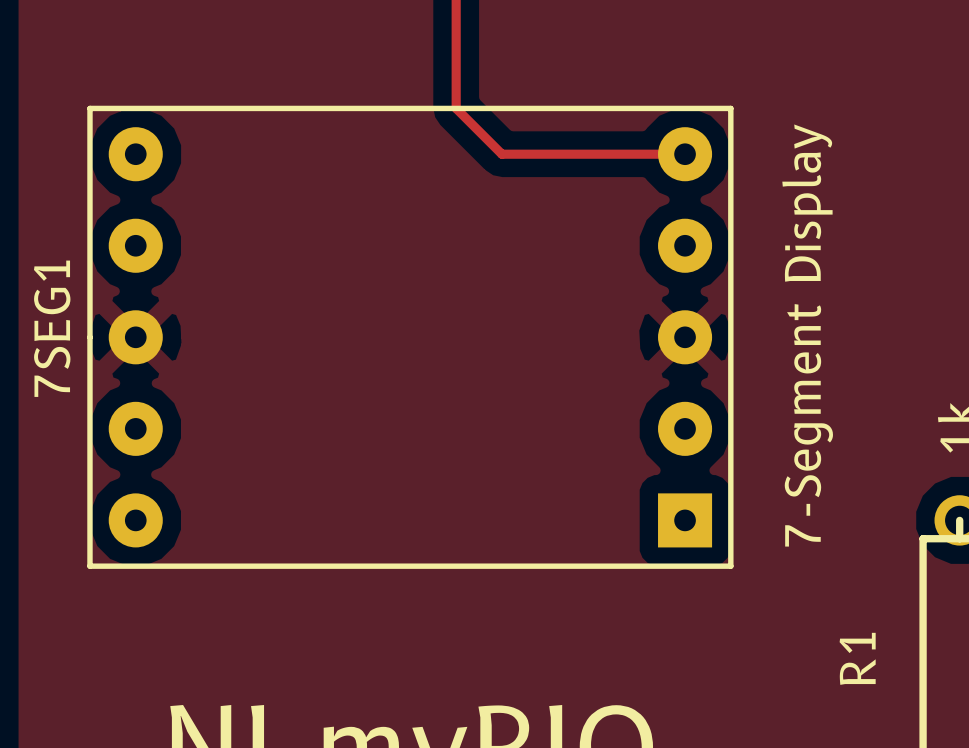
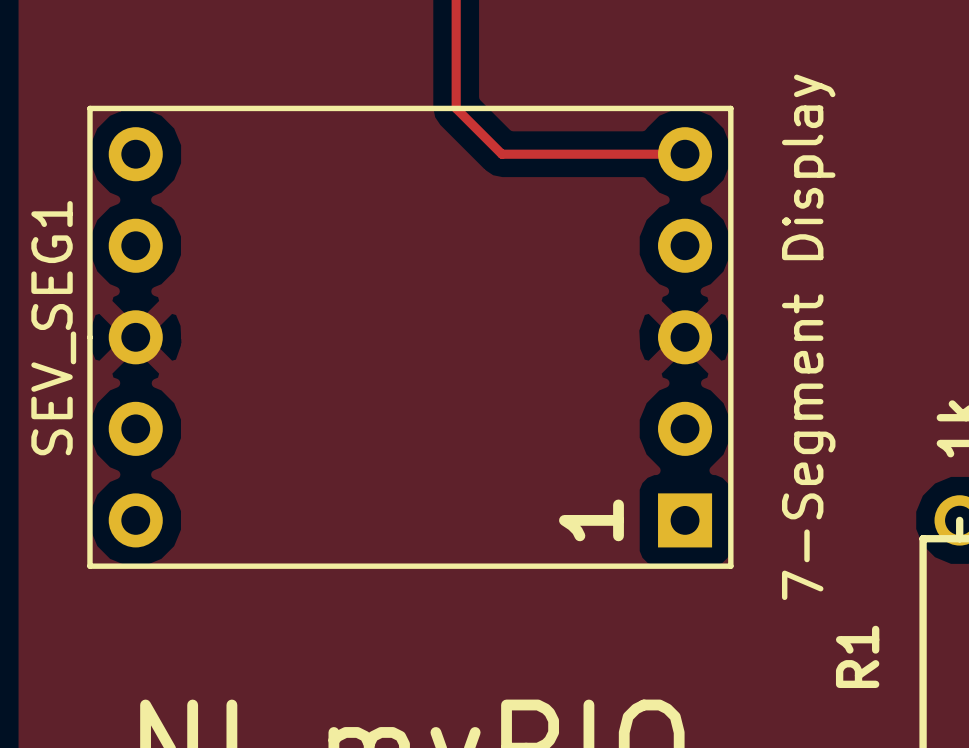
7SEG1: 7-Segment Display (410, 337) -> none
SEV_SEG1: none -> 7-Segment Display (410, 337)
text: none -> 1 (591, 520)

